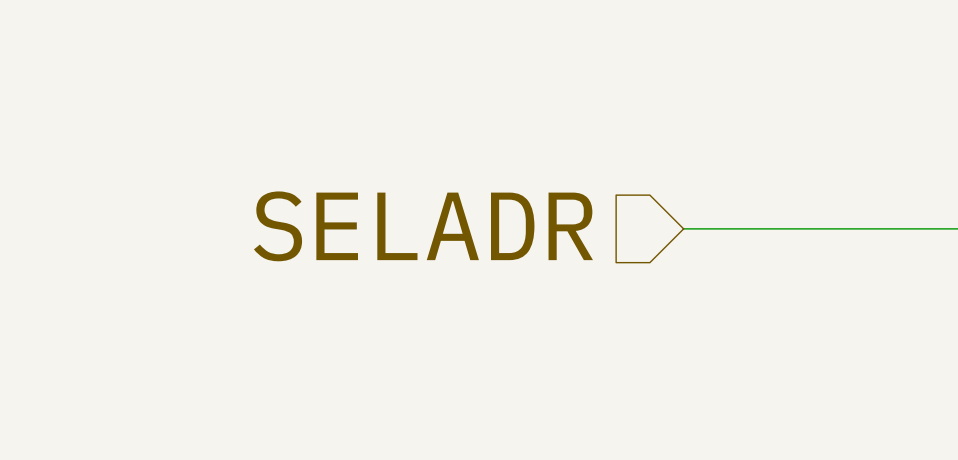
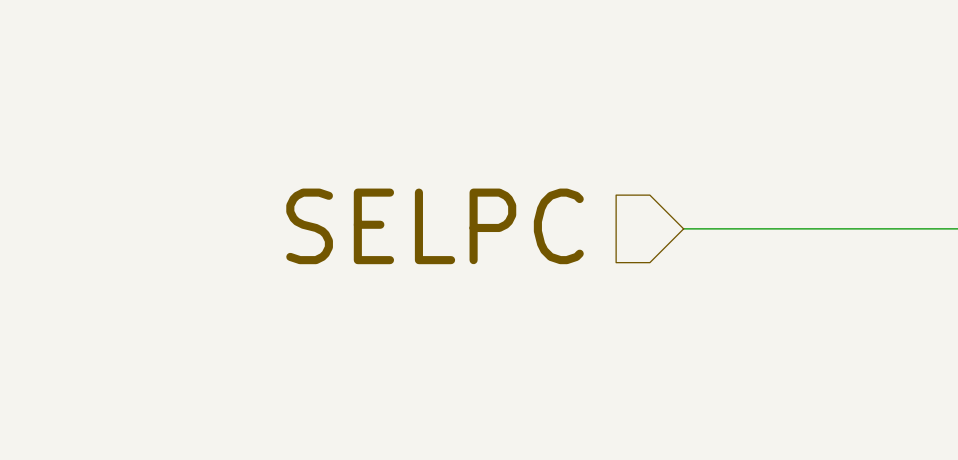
hierarchical label: SELADR (423, 226) -> SELPC (435, 226)

